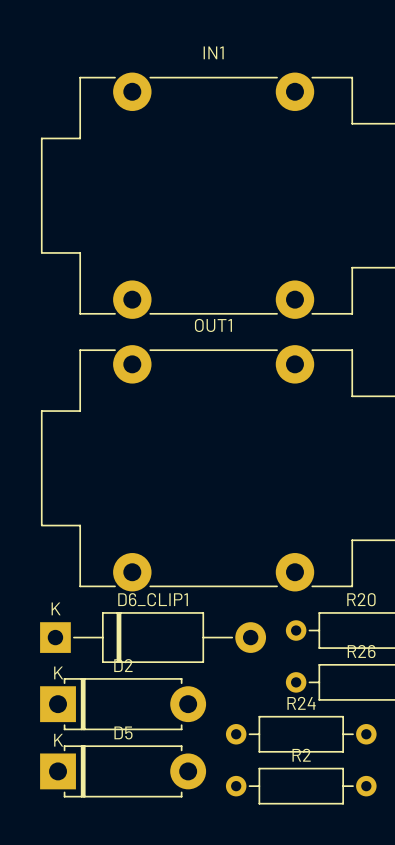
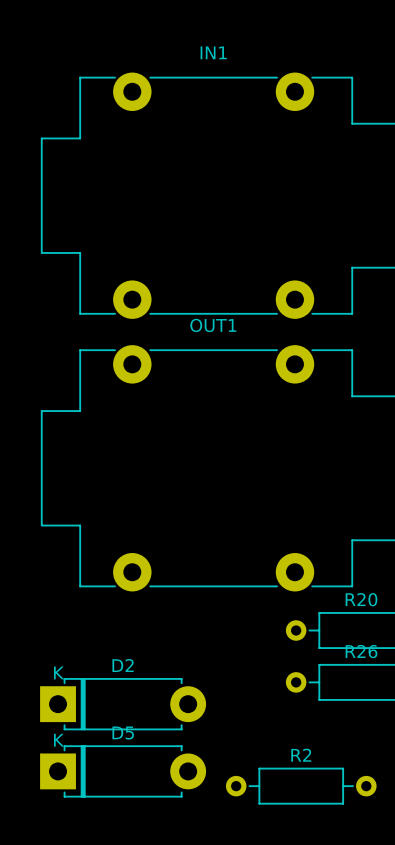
D6_CLIP1: (153, 637) -> none
R24: (301, 734) -> none

